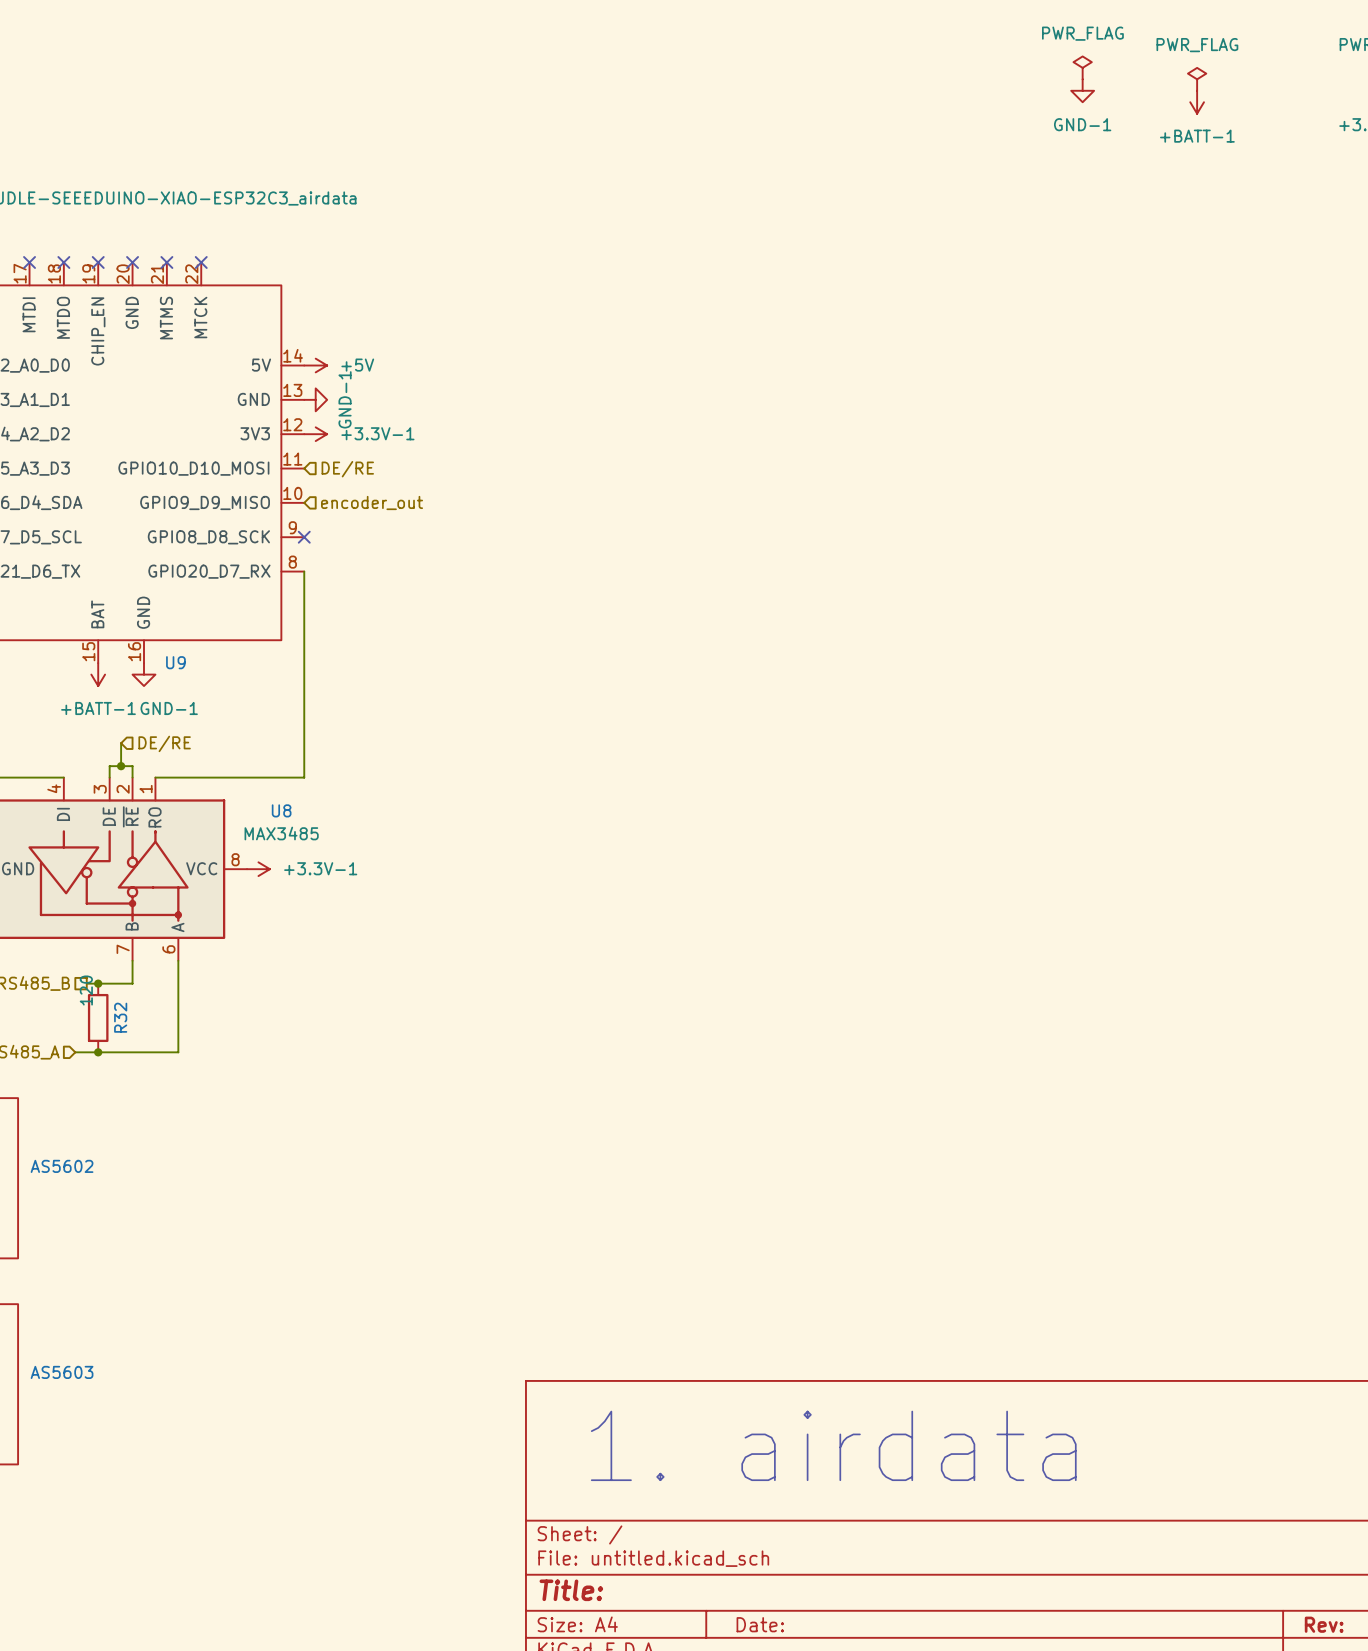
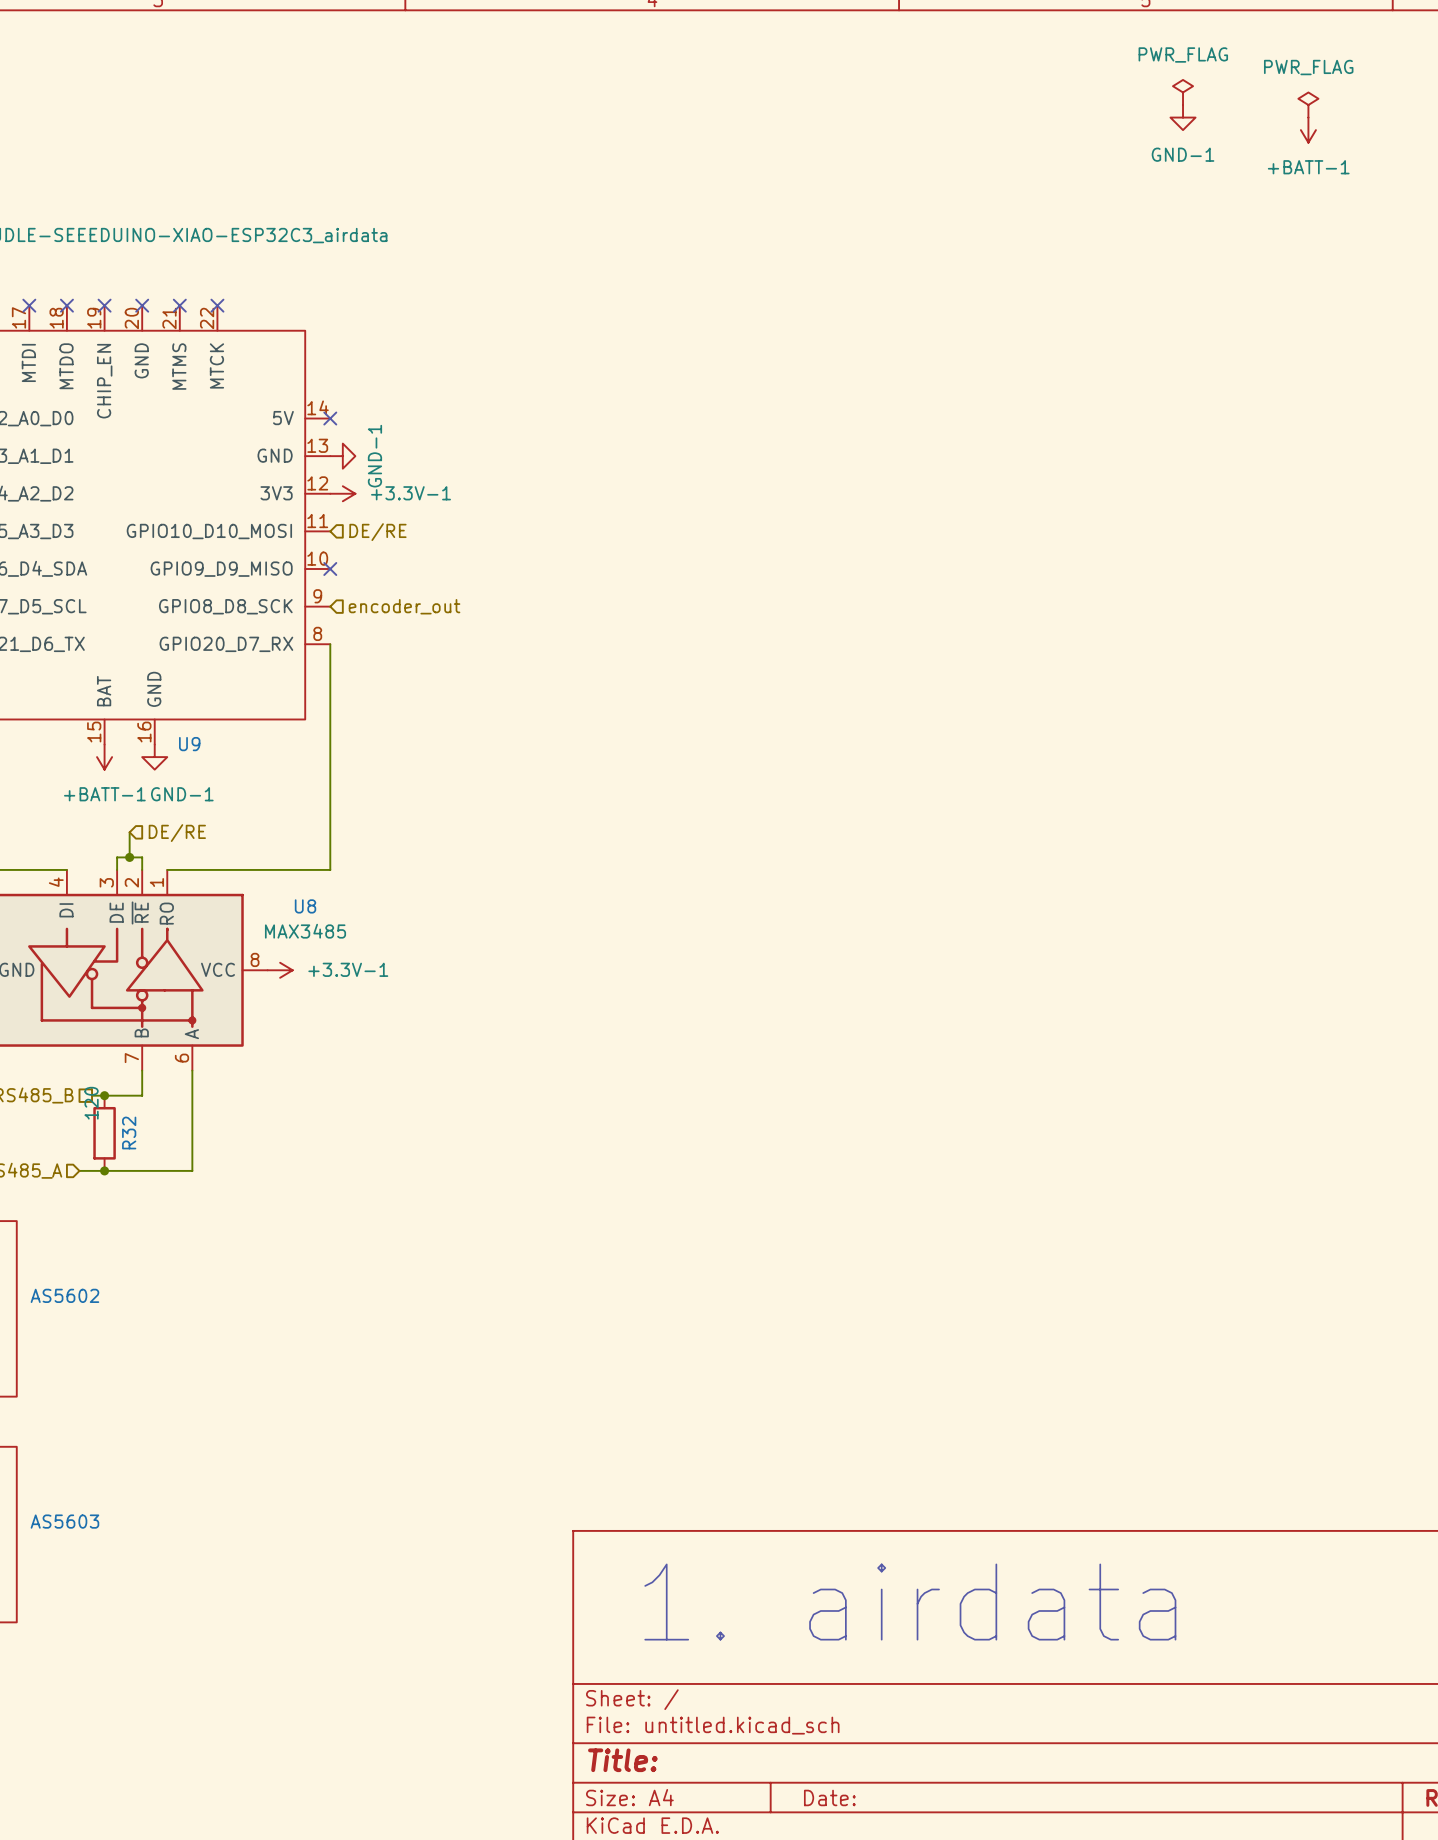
no-connect mark: none -> (330, 418)
power symbol: +5V (315, 365) -> none
hierarchical label position: encoder_out (372, 502) -> encoder_out (404, 606)
no-connect mark position: (304, 537) -> (330, 569)

